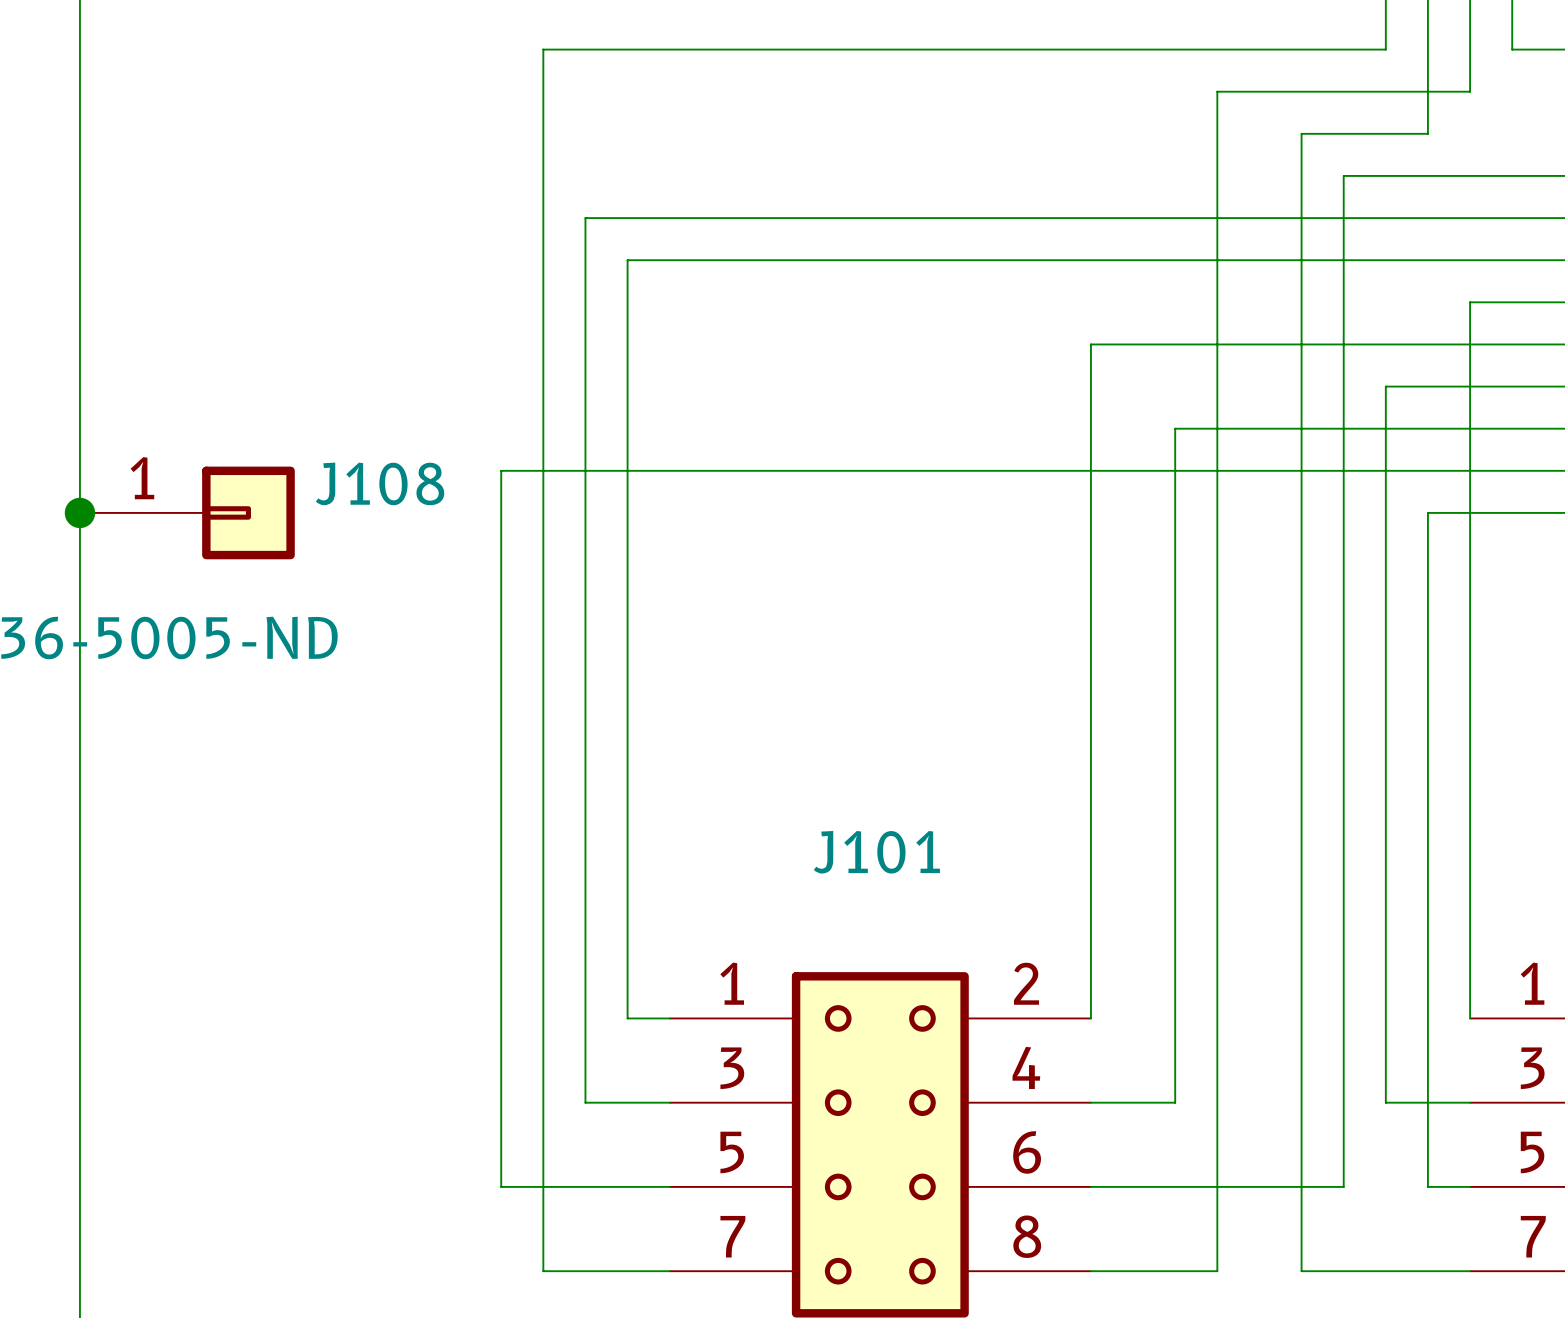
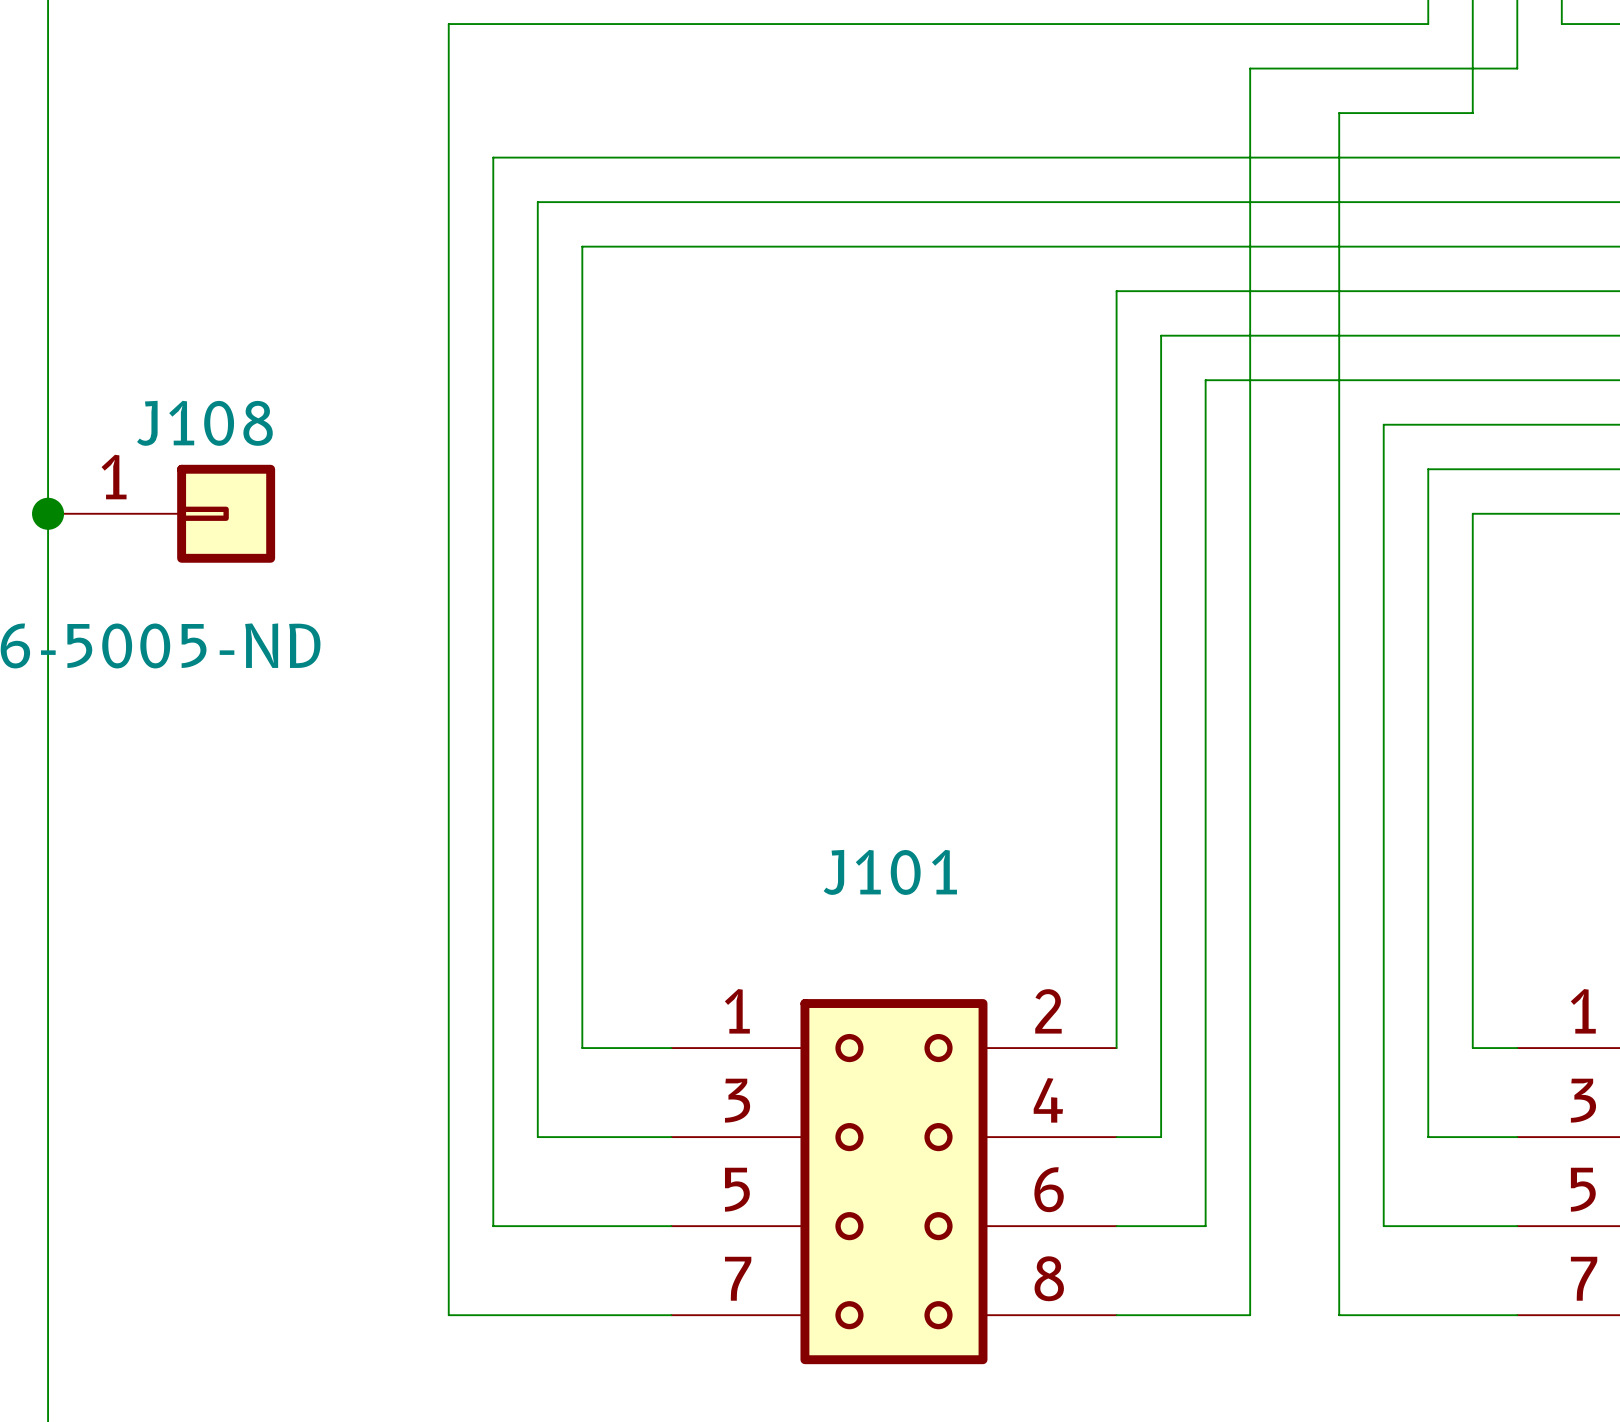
wire: (543, 49) (543, 218) -> none
wire: (1343, 175) (1343, 428) (1175, 428) -> (1428, 380) (1205, 380) (1205, 424)
wire: (585, 218) (585, 260) -> (582, 202) (537, 202)
wire: (627, 260) (627, 1018) -> (626, 246) (582, 246)
wire: (1470, 302) (1470, 1018) -> none
wire: (1090, 344) (1133, 344) -> (1116, 335) (1116, 291) (1517, 291)
wire: none -> (1161, 335) (1161, 1137)
wire: (1385, 386) (1385, 470) (501, 470) -> (1383, 157) (493, 157) (493, 469)
J108 name position: J108 (380, 483) -> J108 (204, 423)
wire: (585, 1018) (585, 1102) -> (537, 1137) (582, 1137)
wire: none -> (582, 1048) (626, 1048)
wire: (1427, 1018) (1427, 1186) -> (1472, 1048) (1517, 1048)
wire: (543, 1102) (543, 1271) -> (537, 24) (448, 24) (448, 1315) (537, 1315)
wire: (1133, 1102) (1175, 1102) -> (1205, 1226) (1205, 1137)
wire: (1175, 1186) (1343, 1186) -> (1472, 1226) (1383, 1226)

